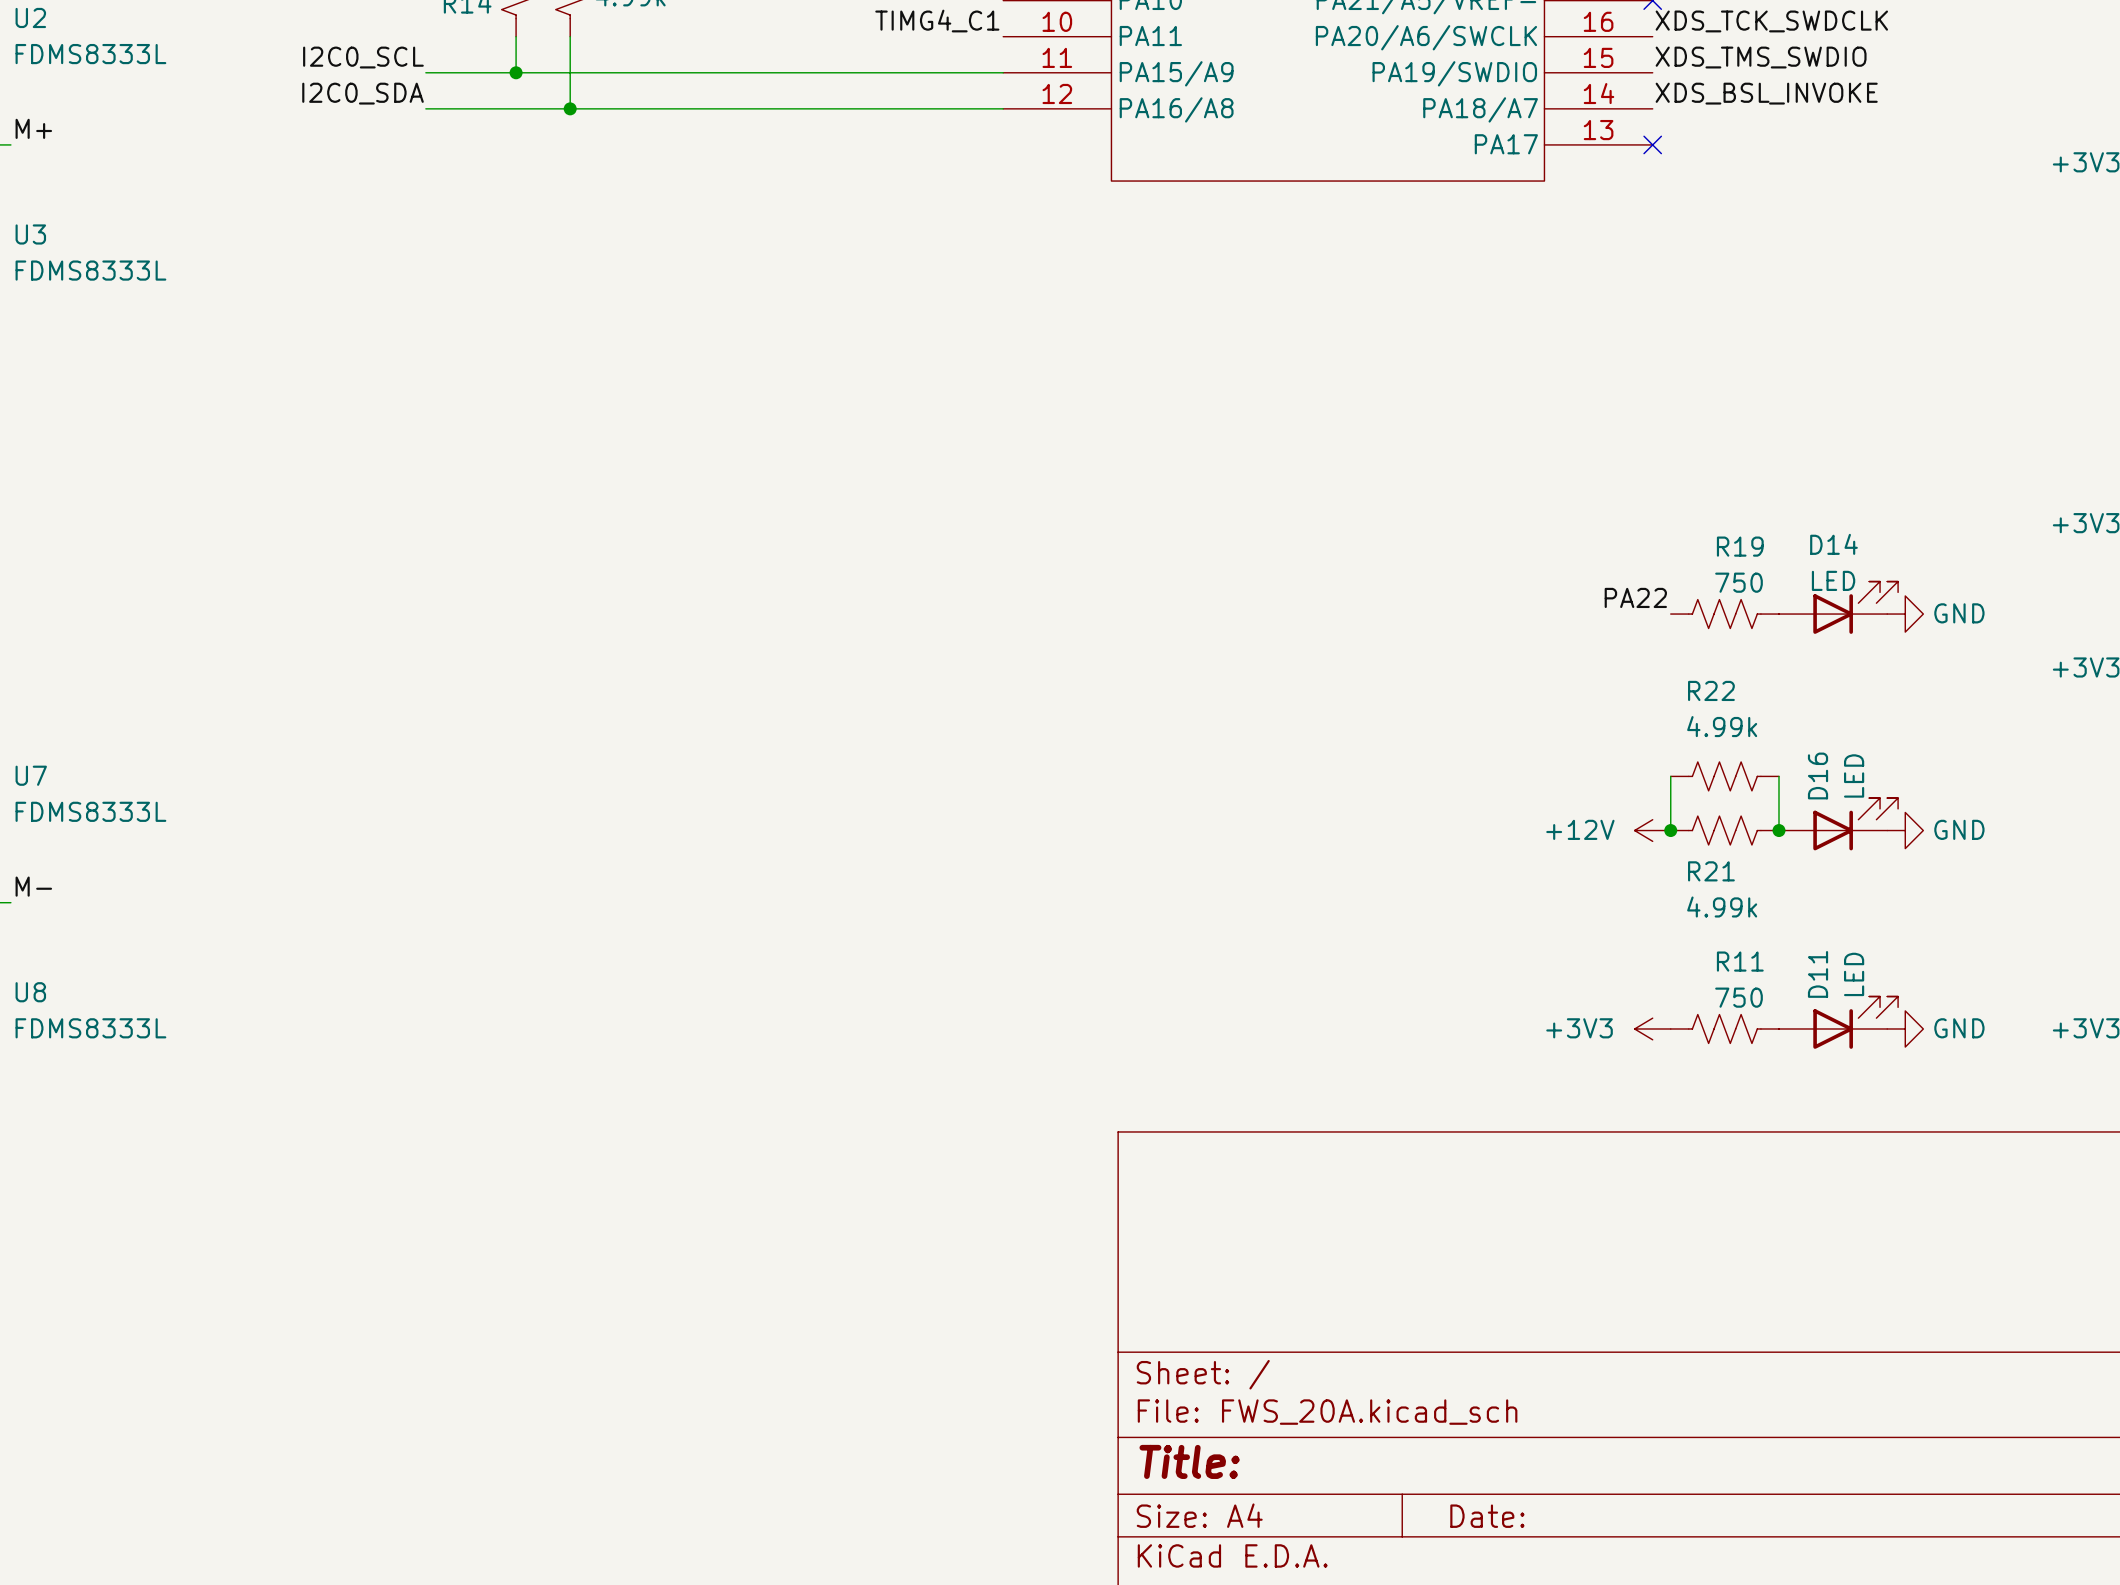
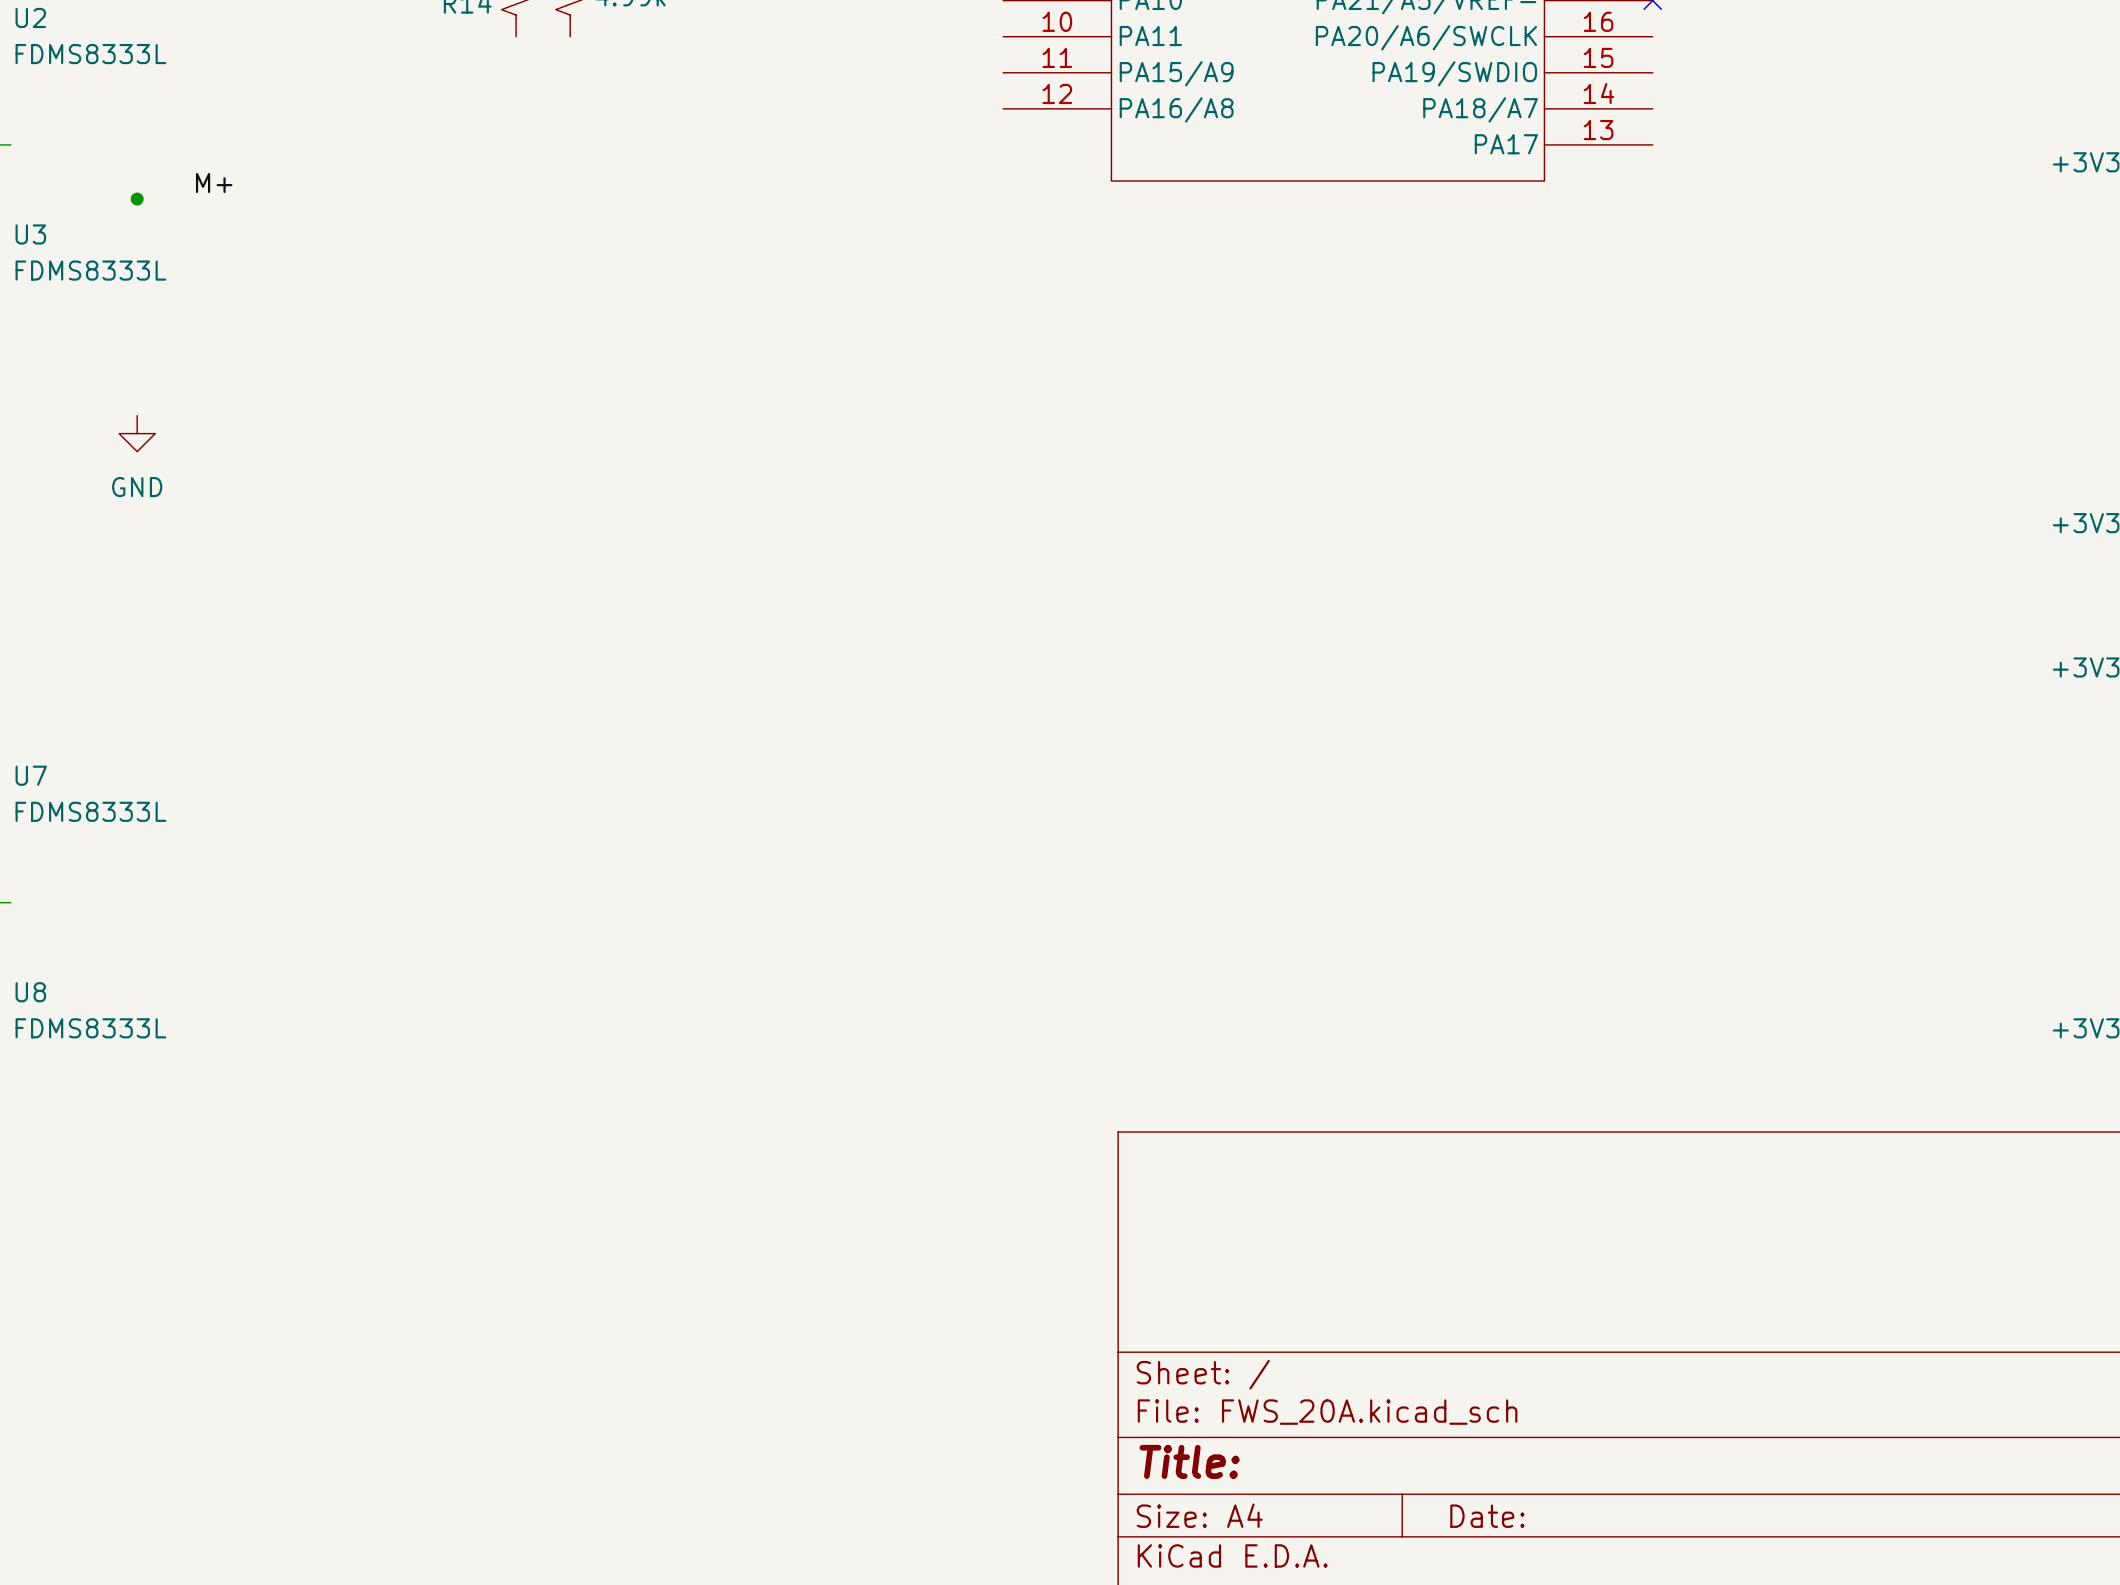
label: TIMG4_C1 (937, 21) -> none
label: XDS_TCK_SWDCLK (1771, 21) -> none
wire: (516, 36) (516, 72) -> none
wire: (570, 36) (570, 108) -> none
label: I2C0_SCL (363, 57) -> none
label: XDS_TMS_SWDIO (1761, 57) -> none
wire: (425, 72) (1003, 72) -> none
junction: (516, 72) -> none
label: I2C0_SDA (363, 93) -> none
label: XDS_BSL_INVOKE (1766, 93) -> none
wire: (425, 108) (1003, 108) -> none
junction: (570, 108) -> none
label position: M+ (33, 128) -> M+ (214, 182)
no-connect mark: (1652, 144) -> none
junction: none -> (137, 199)
power symbol: none -> GND (137, 433)
label: PA22 (1635, 597) -> none
D14: LED (1838, 607) -> none
R19: 750 (1724, 614) -> none
power symbol: GND (1905, 614) -> none
wire: (1670, 776) (1670, 830) -> none
R22: 4.99k (1724, 776) -> none
wire: (1778, 776) (1778, 830) -> none
D16: LED (1838, 824) -> none
power symbol: +12V (1652, 830) -> none
junction: (1670, 830) -> none
R21: 4.99k (1724, 830) -> none
junction: (1778, 830) -> none
power symbol: GND (1905, 830) -> none
label: M- (33, 886) -> none
D11: LED (1838, 1022) -> none
power symbol: +3V3 (1652, 1028) -> none
R11: 750 (1724, 1028) -> none
power symbol: GND (1905, 1028) -> none

